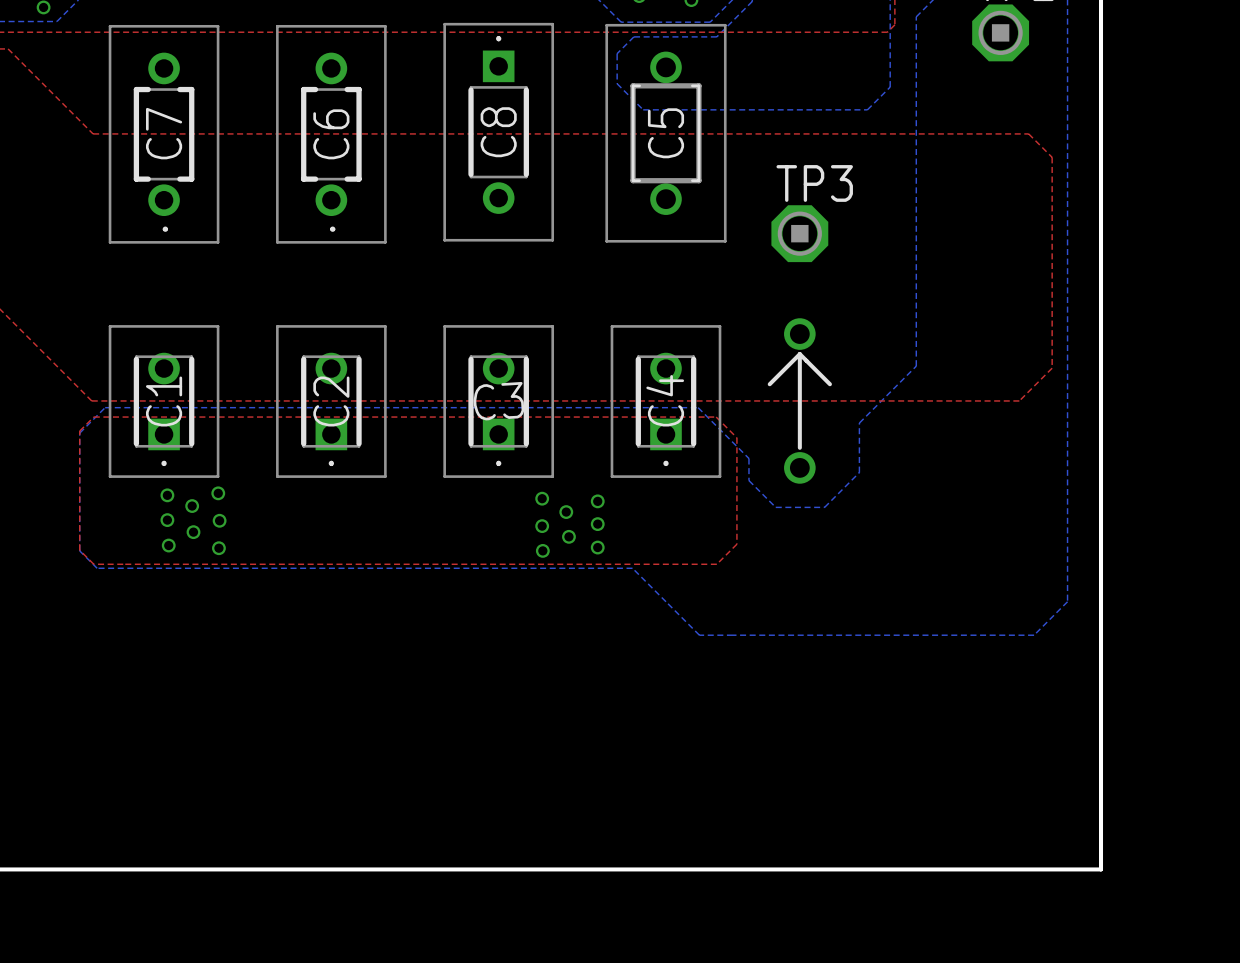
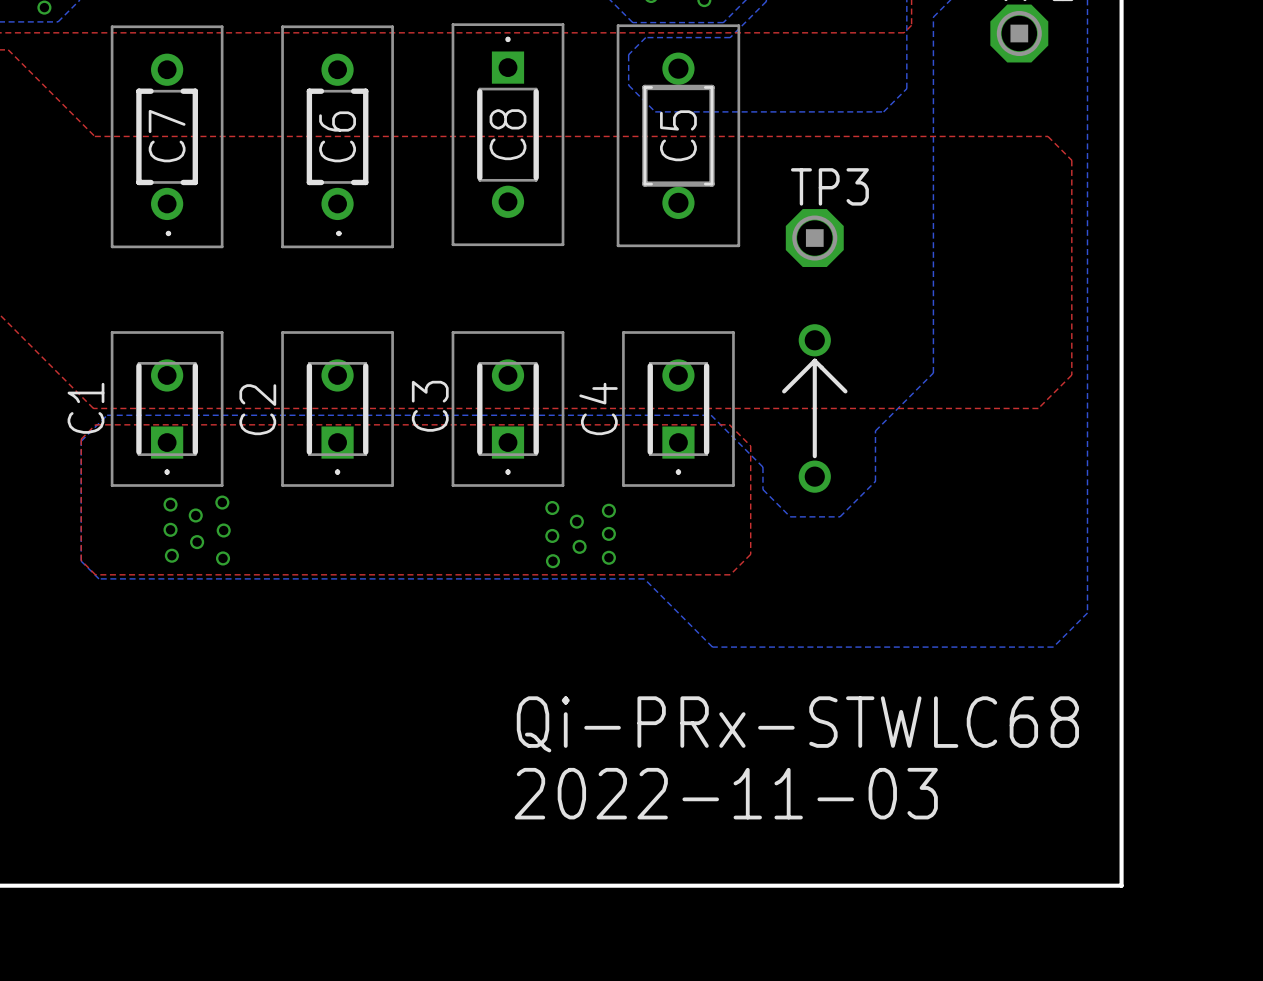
C4 name position: C4 (665, 400) -> C4 (598, 408)
C1 name position: C1 (164, 401) -> C1 (85, 408)
C2 name position: C2 (331, 401) -> C2 (257, 409)
C3 name rotation: 0° (498, 401) -> 86.4° counterclockwise (430, 406)
text: none -> Qi-PRx-STWLC68 (797, 724)
text: none -> 2022-11-03 (726, 793)

